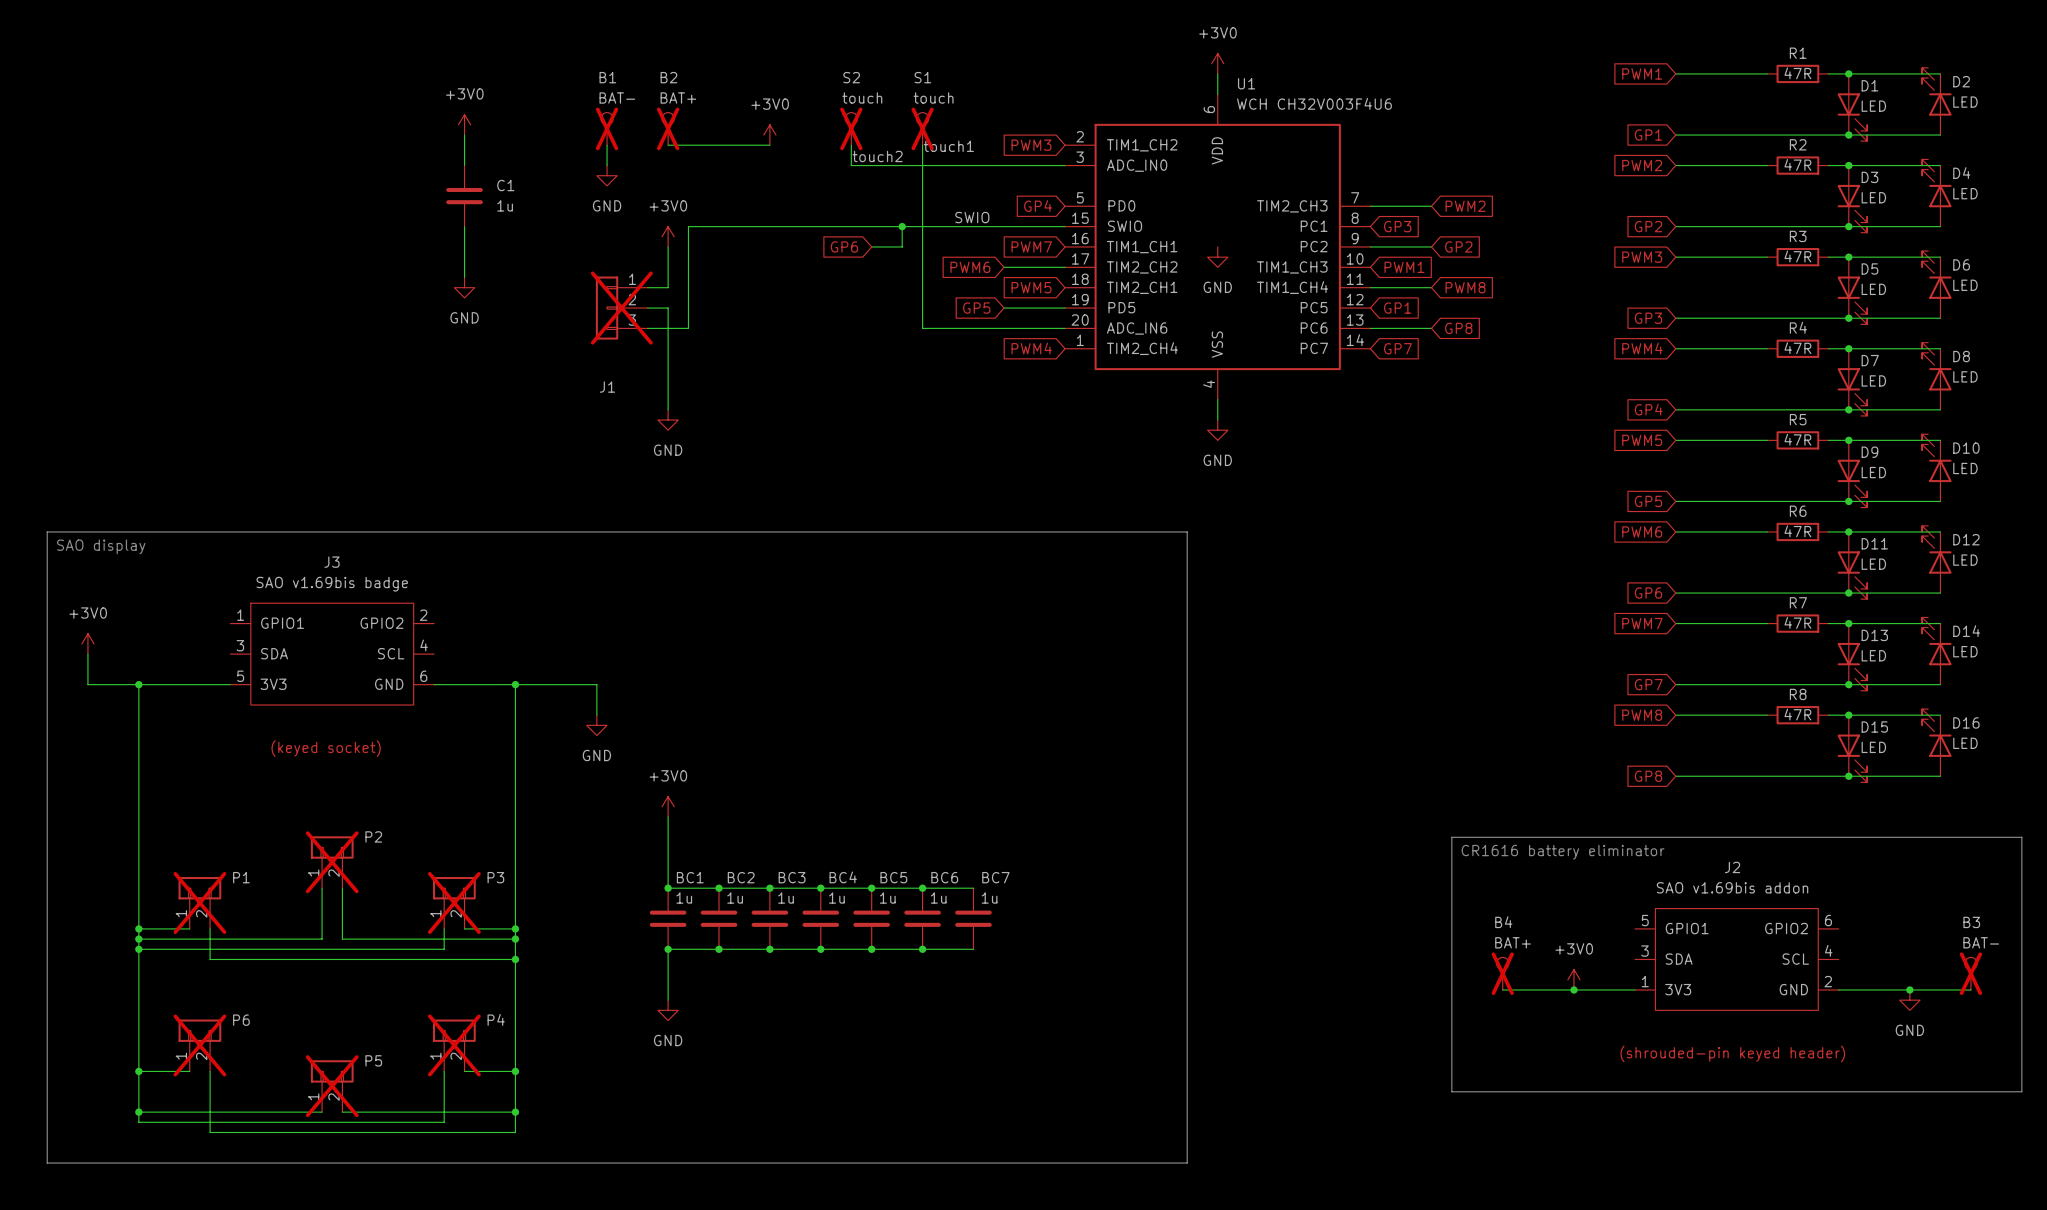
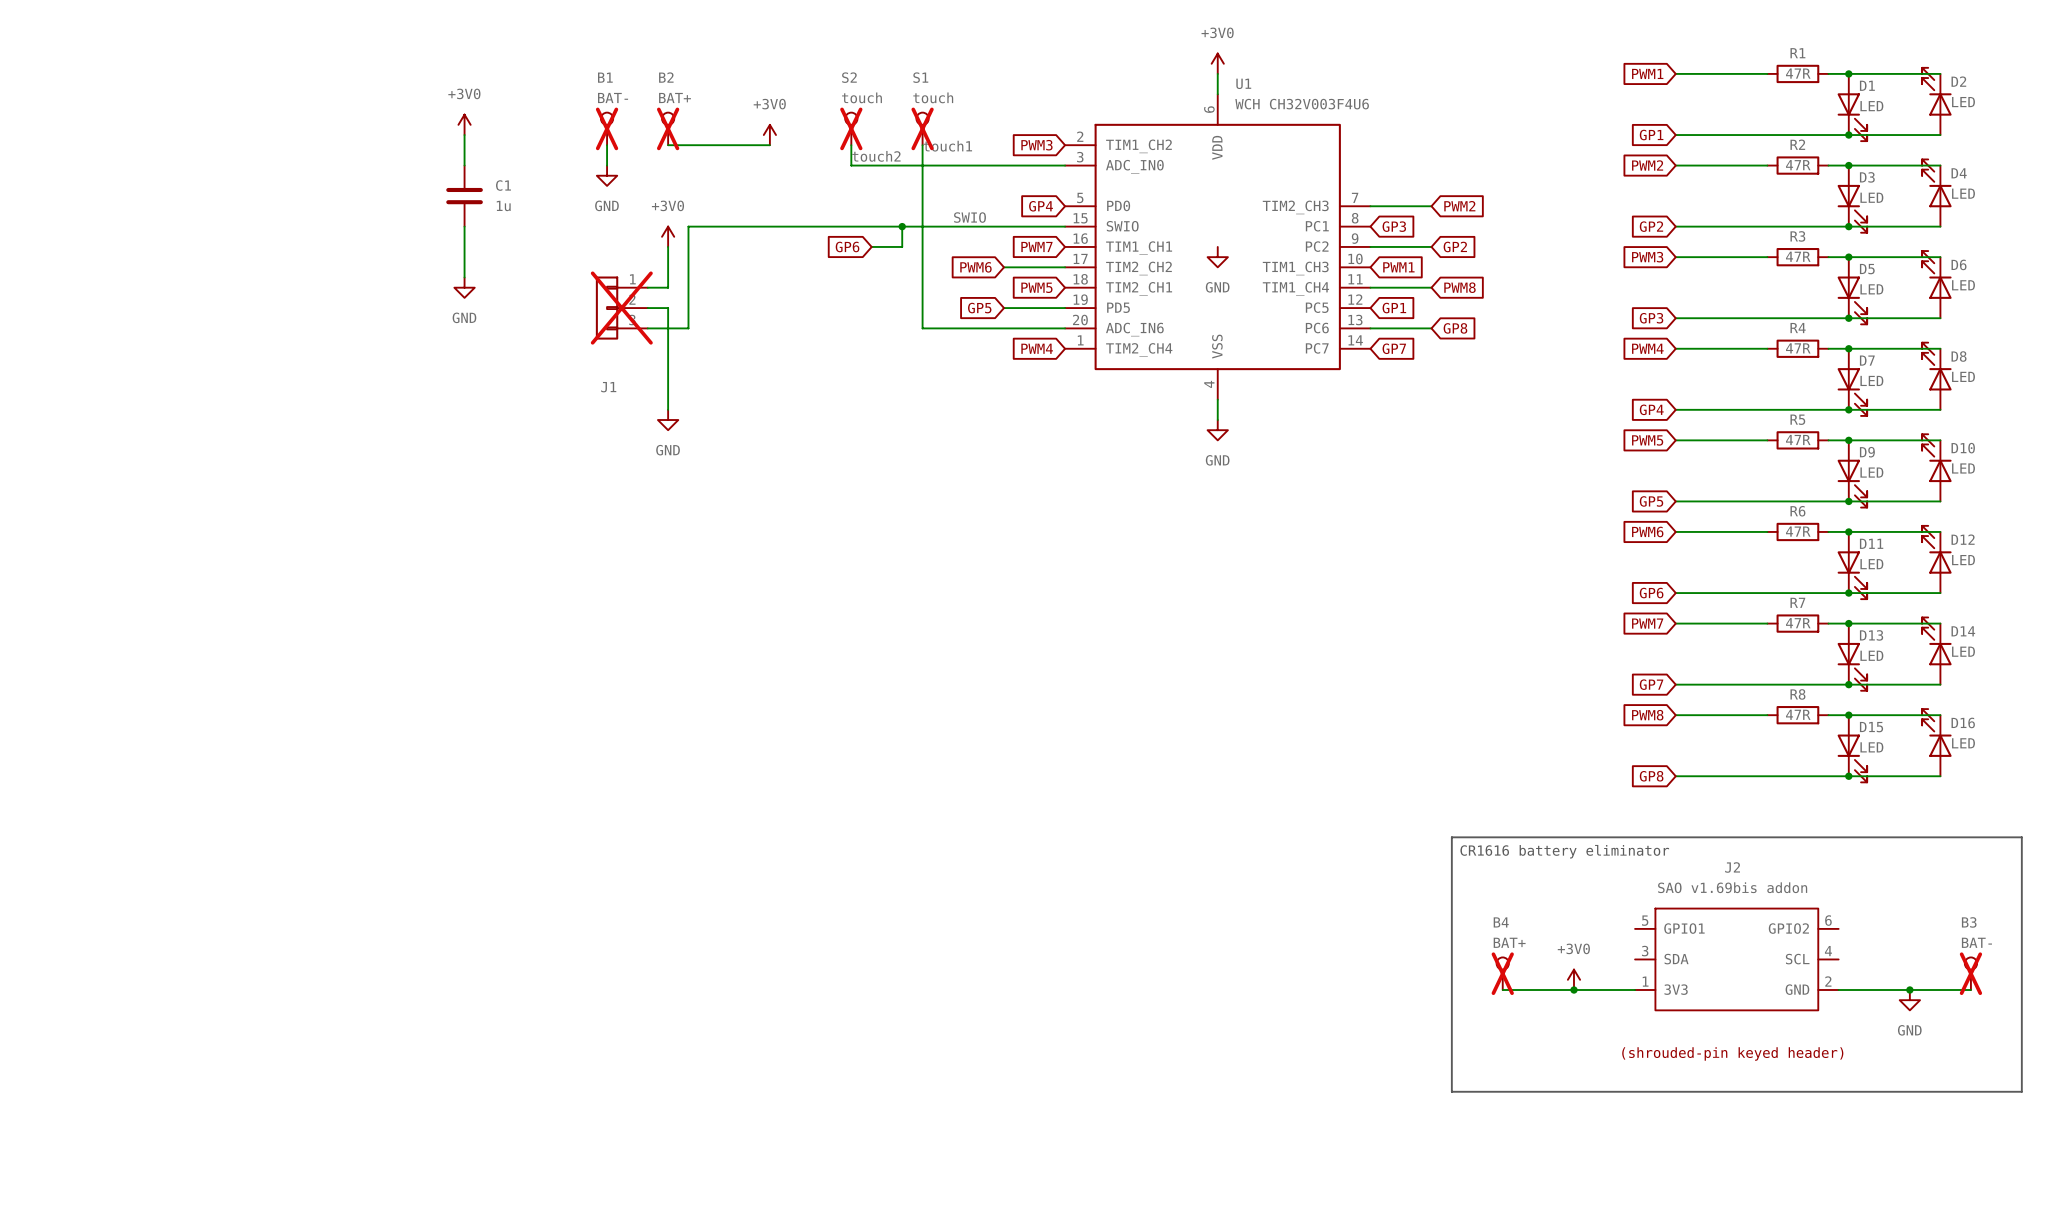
line: (47, 531) (1187, 531) (1187, 1163) (47, 1163) (47, 531) -> none
text: SAO display (101, 546) -> none
power symbol: +3V0 (87, 643) -> none
wire: (87, 654) (87, 684) (230, 684) -> none
J3: SAO v1.69bis badge (332, 654) -> none
wire: (138, 684) (138, 1122) (444, 1122) (444, 1071) -> none
junction: (138, 684) -> none
wire: (434, 684) (596, 684) (596, 715) -> none
wire: (515, 684) (515, 1132) (210, 1132) (210, 1071) -> none
junction: (515, 684) -> none
power symbol: GND (596, 725) -> none
power symbol: +3V0 (668, 806) -> none
wire: (668, 816) (668, 888) (973, 888) -> none
P2: (332, 862) -> none
wire: (322, 888) (322, 939) (138, 939) -> none
wire: (342, 888) (342, 939) (515, 939) -> none
junction: (668, 888) -> none
junction: (719, 888) -> none
junction: (769, 888) -> none
junction: (820, 888) -> none
junction: (871, 888) -> none
junction: (922, 888) -> none
P1: (199, 902) -> none
P3: (454, 902) -> none
BC1: 1u (668, 918) -> none
BC2: 1u (719, 918) -> none
BC3: 1u (769, 918) -> none
BC4: 1u (820, 918) -> none
BC5: 1u (871, 918) -> none
BC6: 1u (922, 918) -> none
BC7: 1u (973, 918) -> none
wire: (138, 928) (189, 928) -> none
junction: (138, 928) -> none
wire: (210, 928) (210, 959) (515, 959) -> none
wire: (444, 928) (444, 949) (138, 949) -> none
wire: (464, 928) (515, 928) -> none
junction: (515, 928) -> none
junction: (138, 939) -> none
junction: (515, 939) -> none
junction: (138, 949) -> none
junction: (668, 949) -> none
junction: (719, 949) -> none
junction: (769, 949) -> none
junction: (820, 949) -> none
junction: (871, 949) -> none
junction: (922, 949) -> none
wire: (973, 949) (668, 949) (668, 1000) -> none
junction: (515, 959) -> none
power symbol: GND (668, 1010) -> none
P6: (199, 1045) -> none
P4: (454, 1045) -> none
wire: (138, 1071) (189, 1071) -> none
junction: (138, 1071) -> none
wire: (464, 1071) (515, 1071) -> none
junction: (515, 1071) -> none
P5: (332, 1086) -> none
wire: (138, 1112) (322, 1112) -> none
junction: (138, 1112) -> none
wire: (342, 1112) (515, 1112) -> none
junction: (515, 1112) -> none

